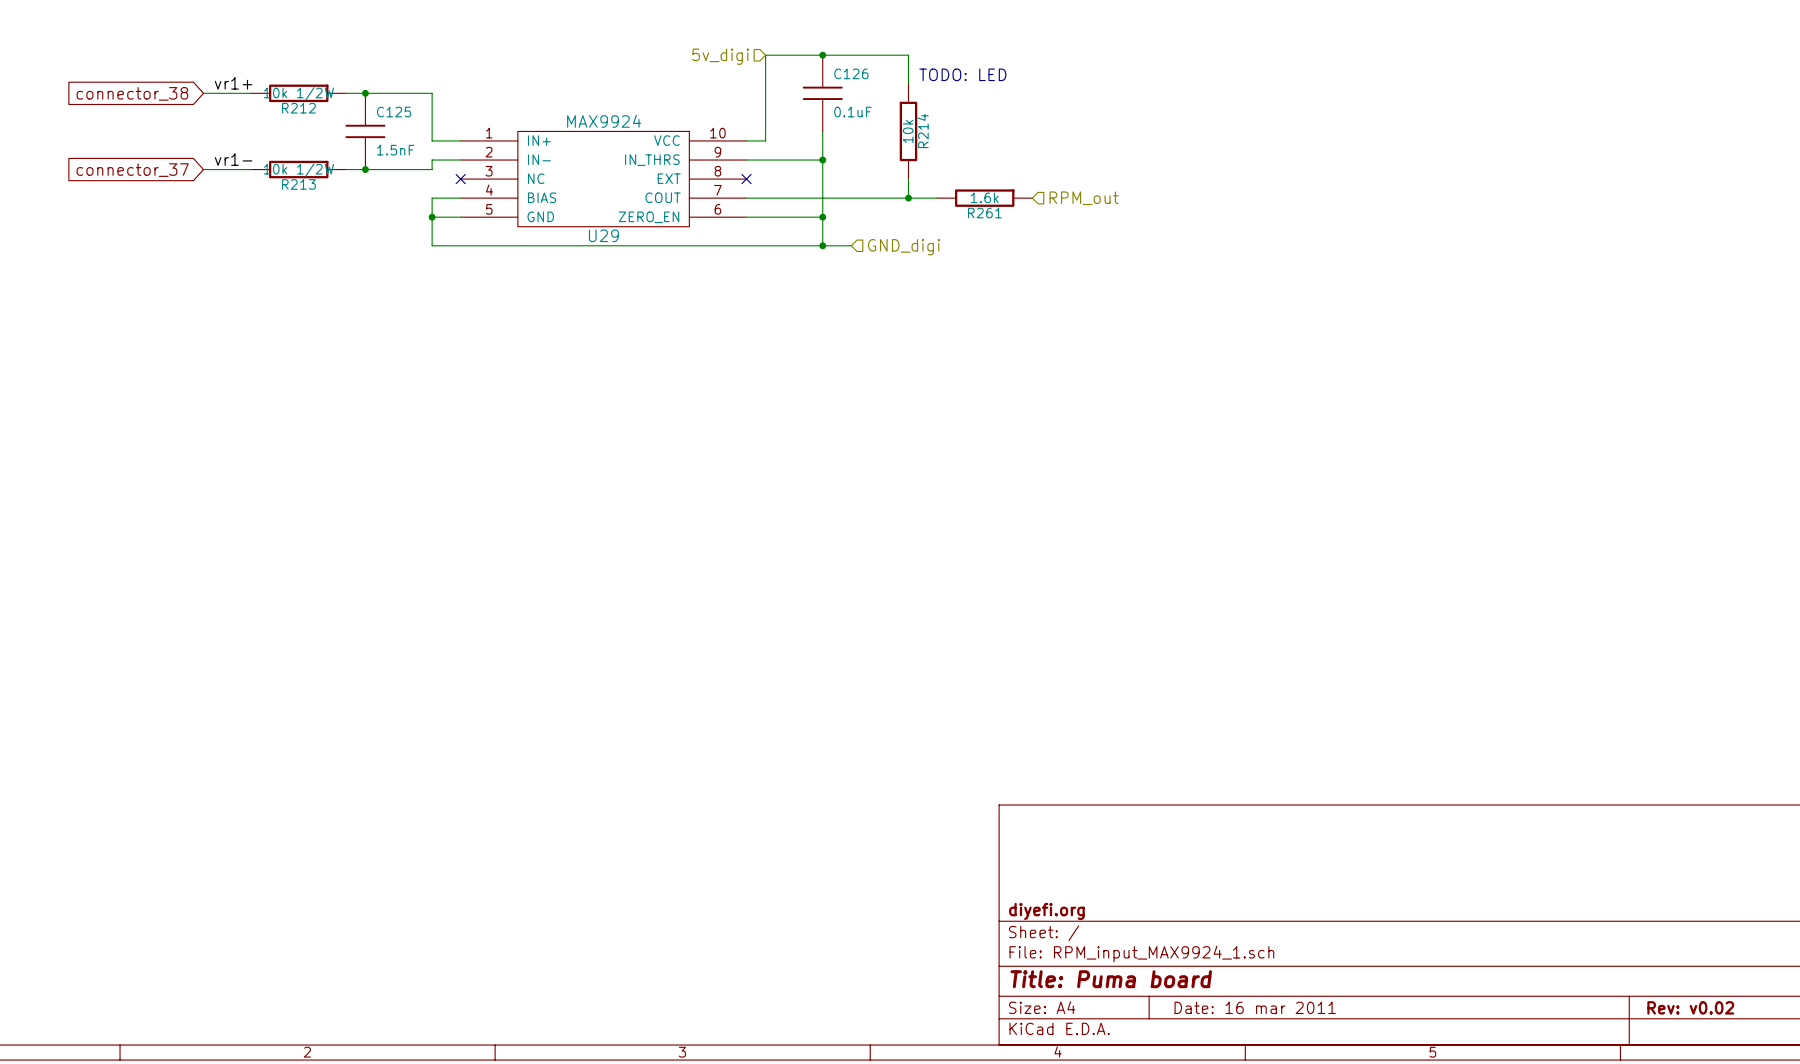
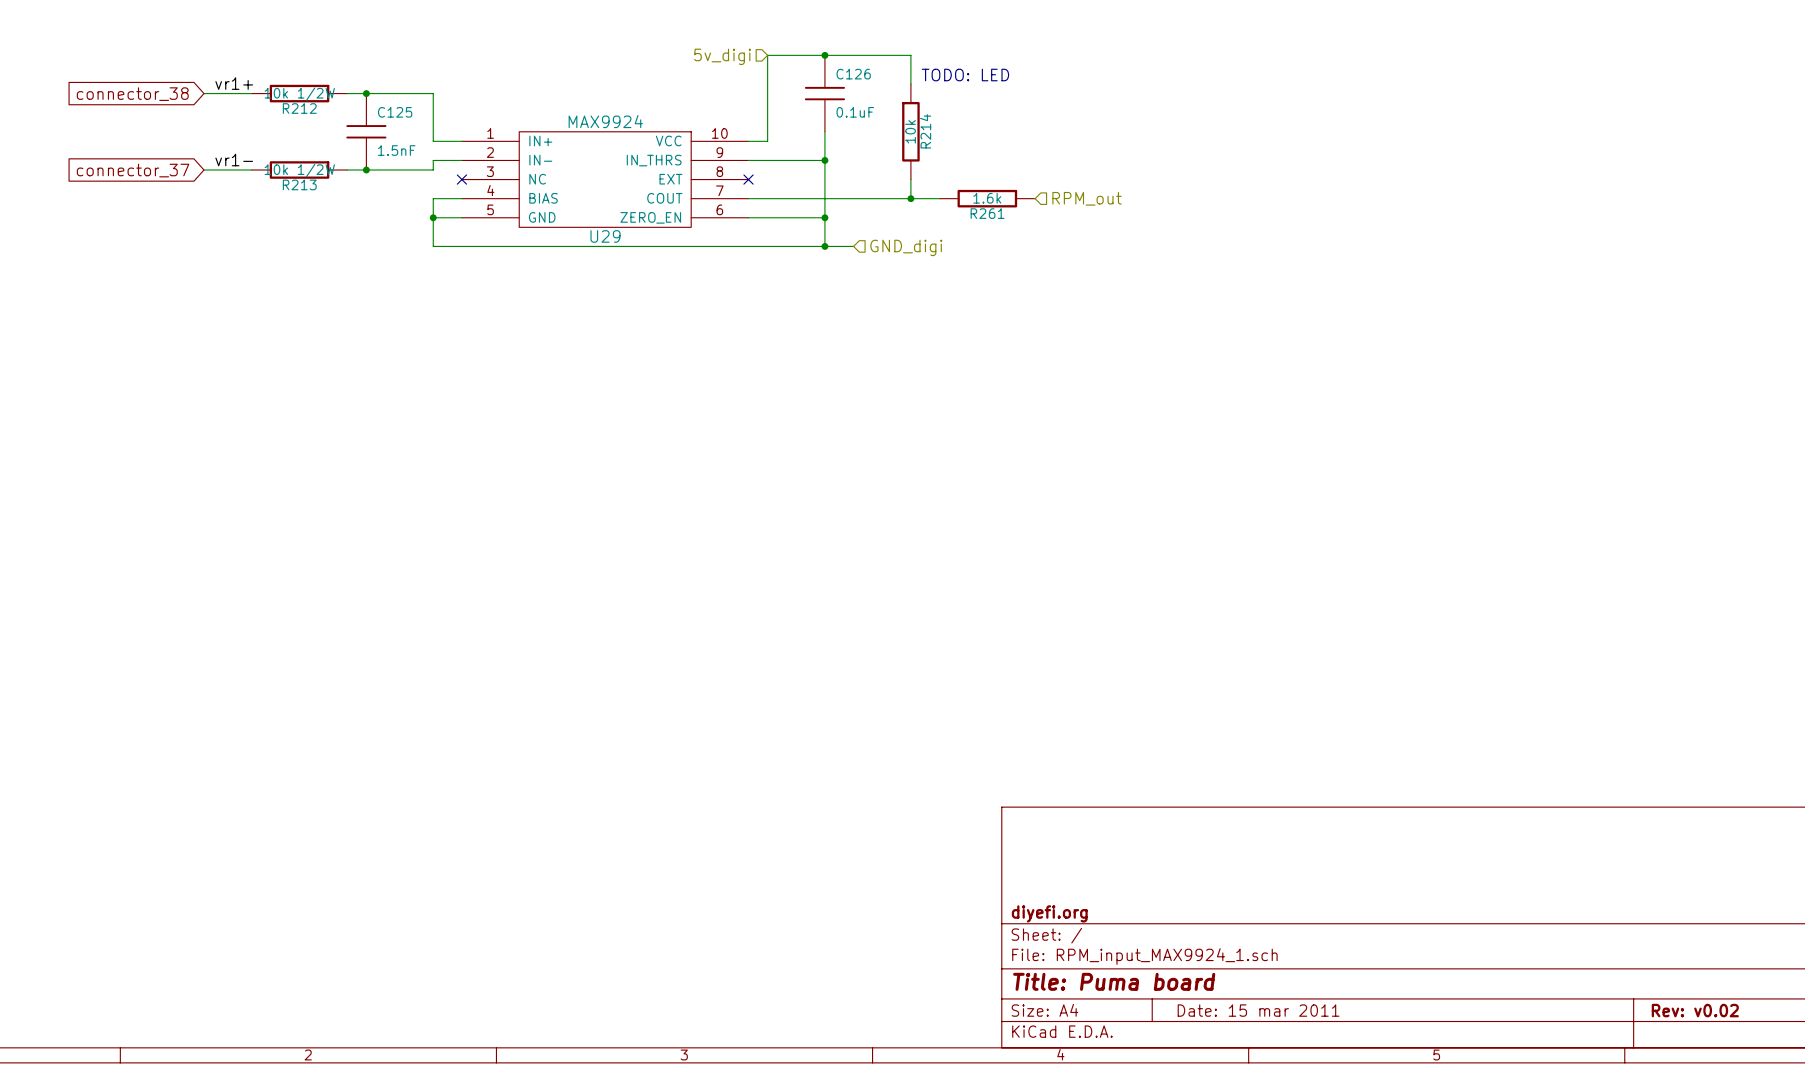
title block: Date: 16 mar 2011 (1255, 1007) -> Date: 15 mar 2011 (1258, 1010)

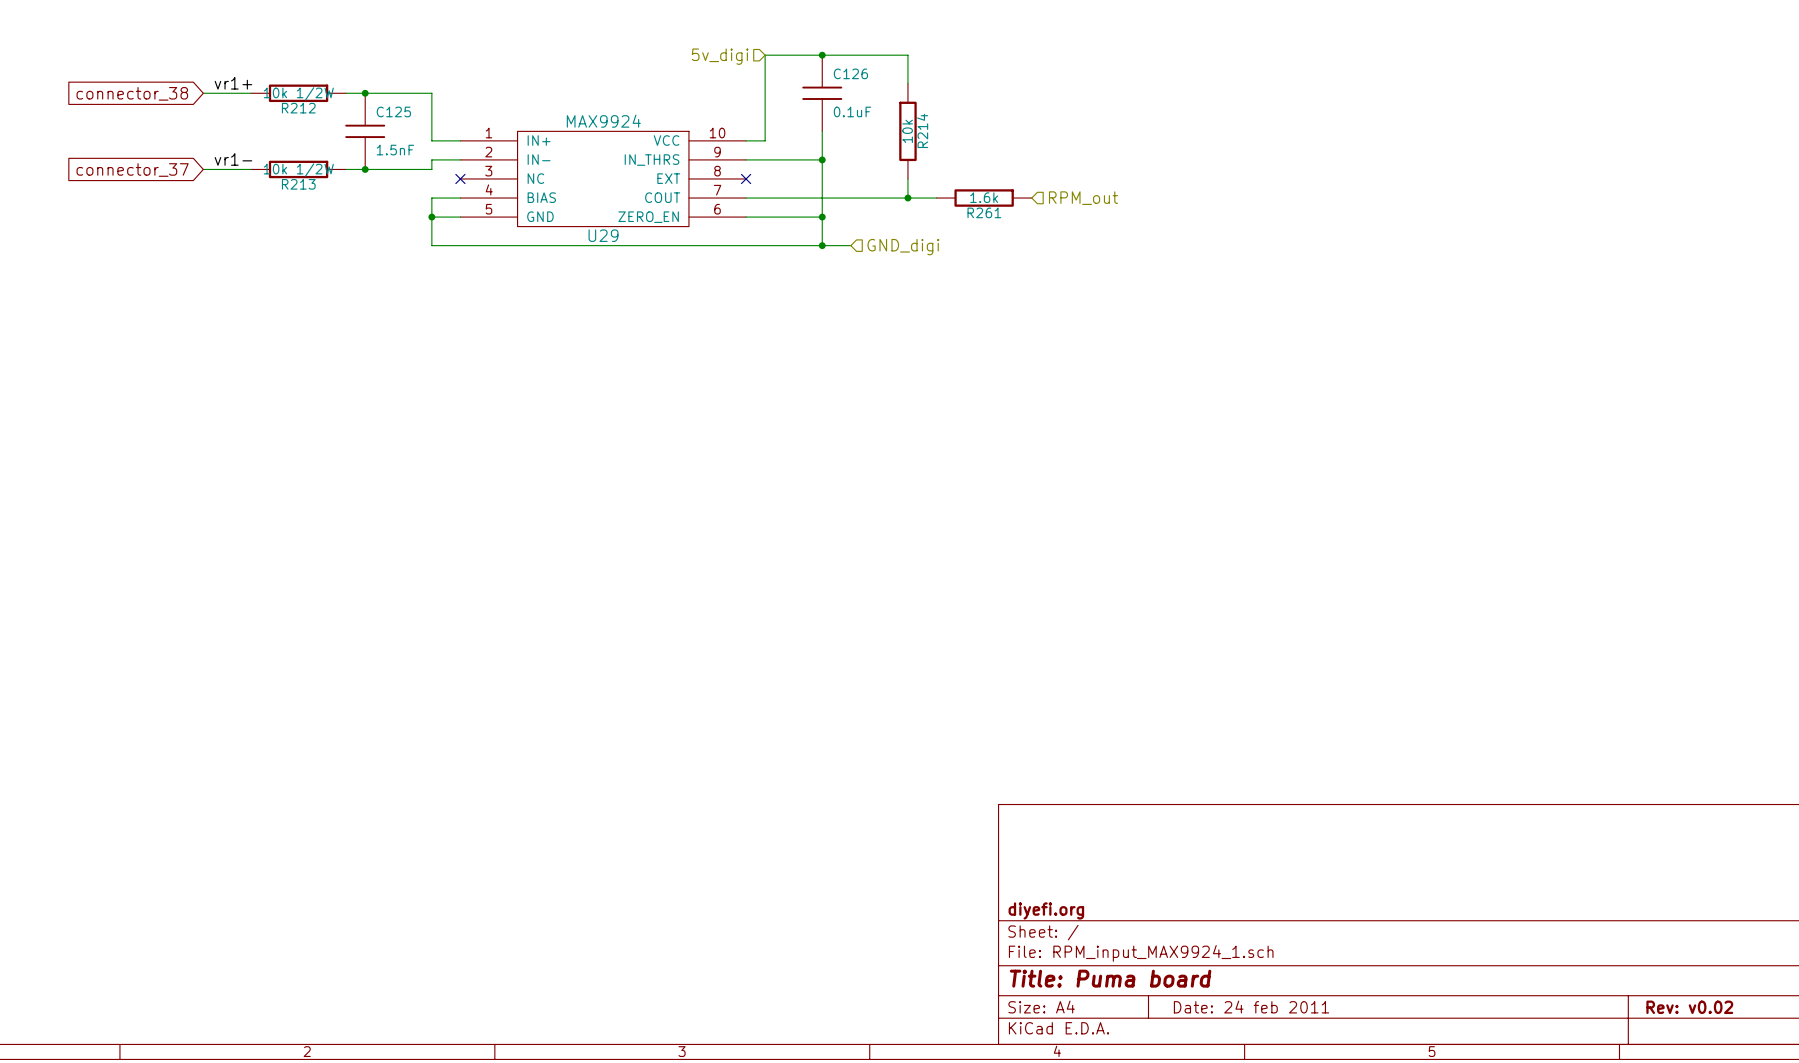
text: TODO: LED (965, 75) -> none
title block: Date: 15 mar 2011 (1258, 1010) -> Date: 24 feb 2011 (1251, 1007)

